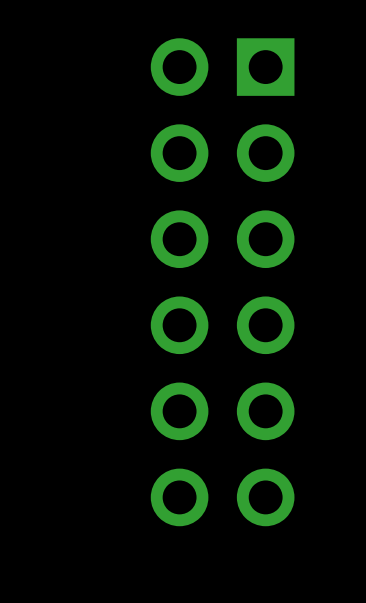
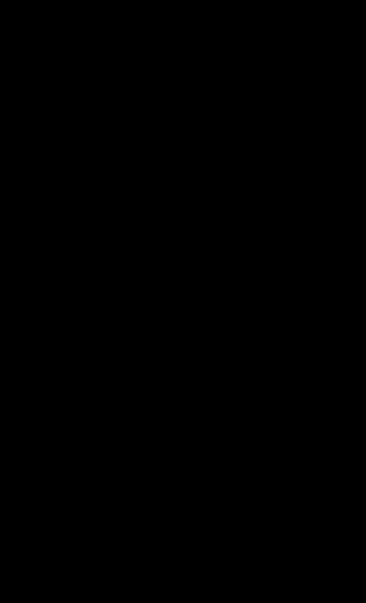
part: (222, 282) -> none

